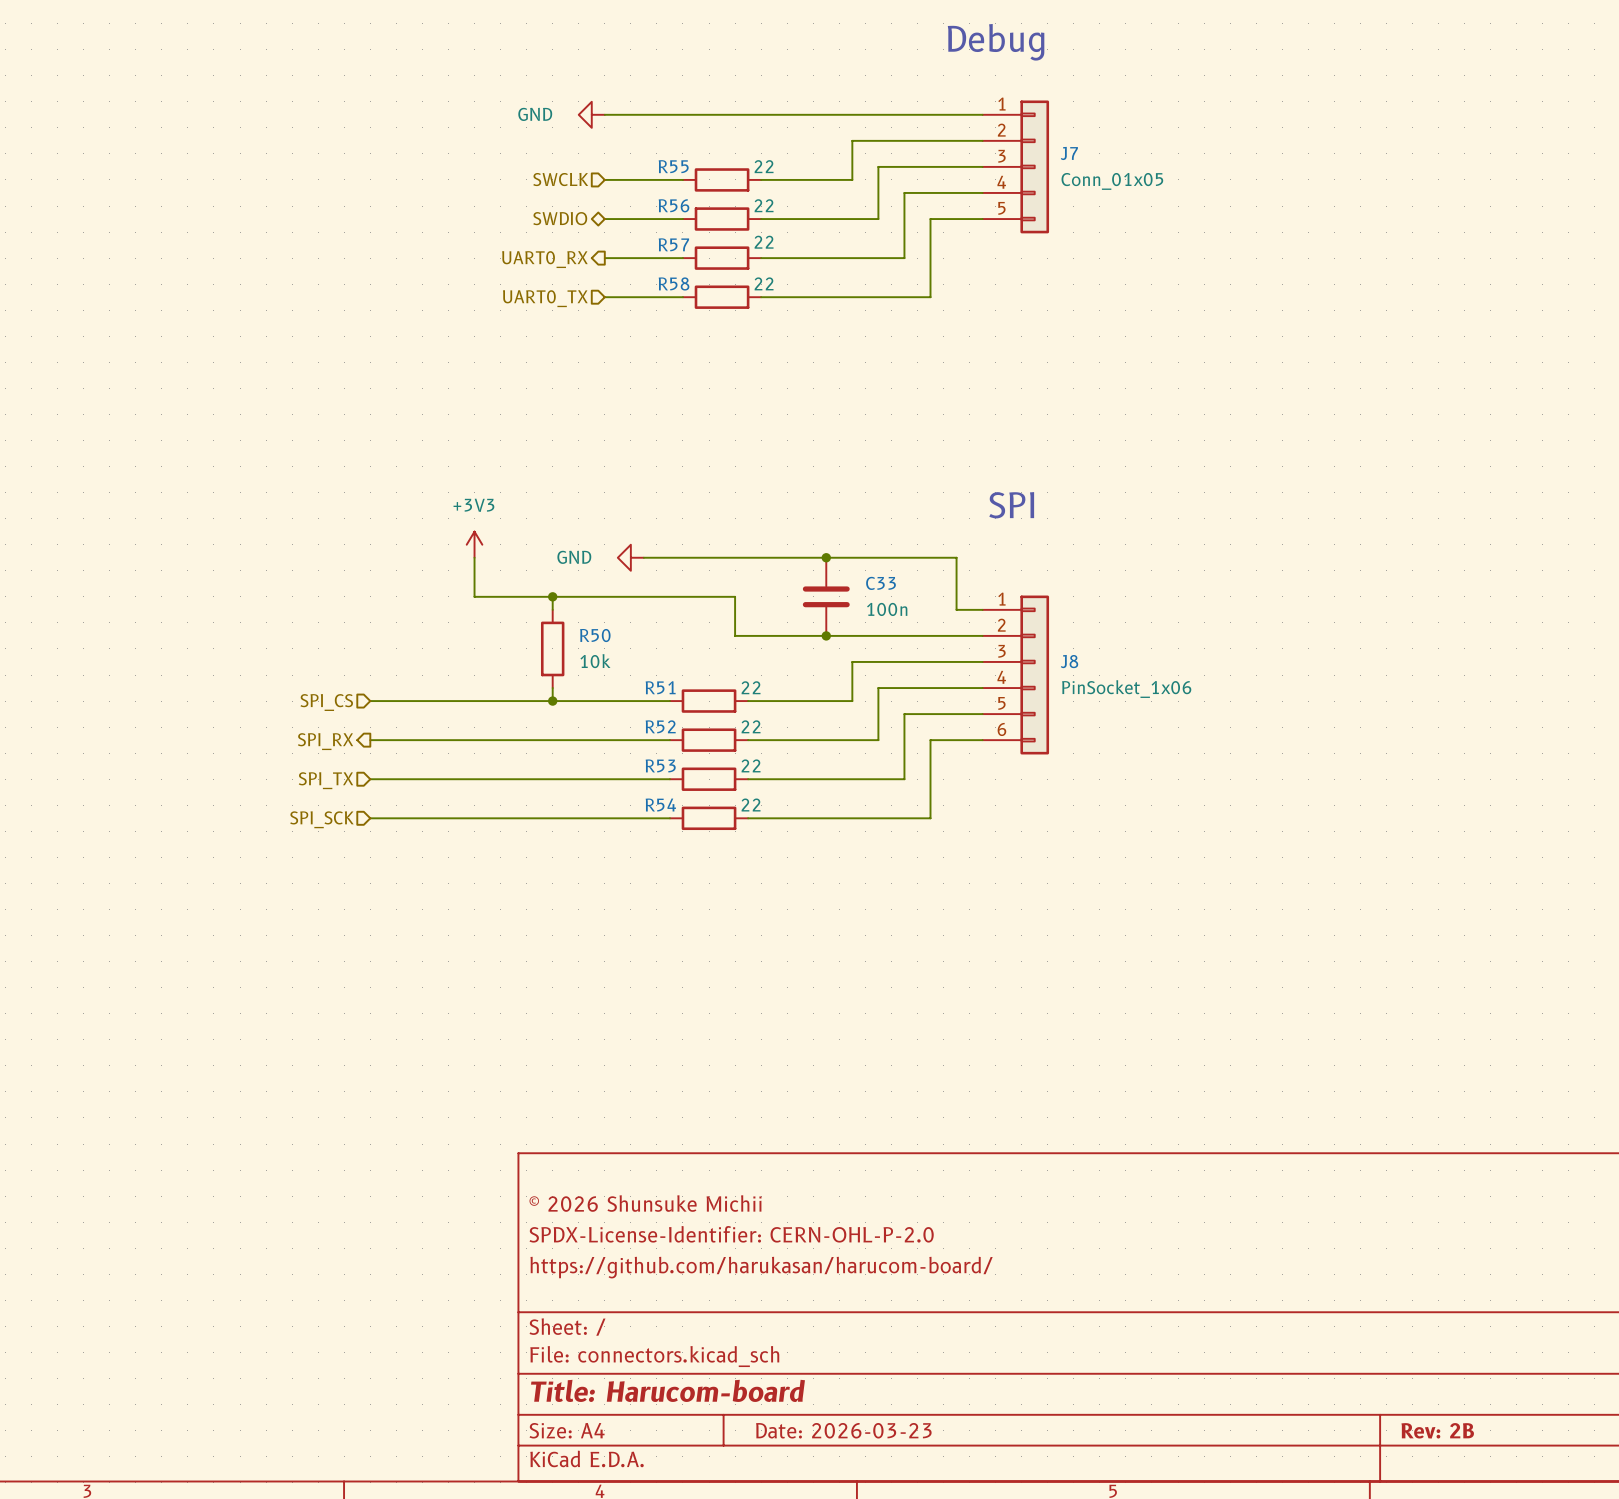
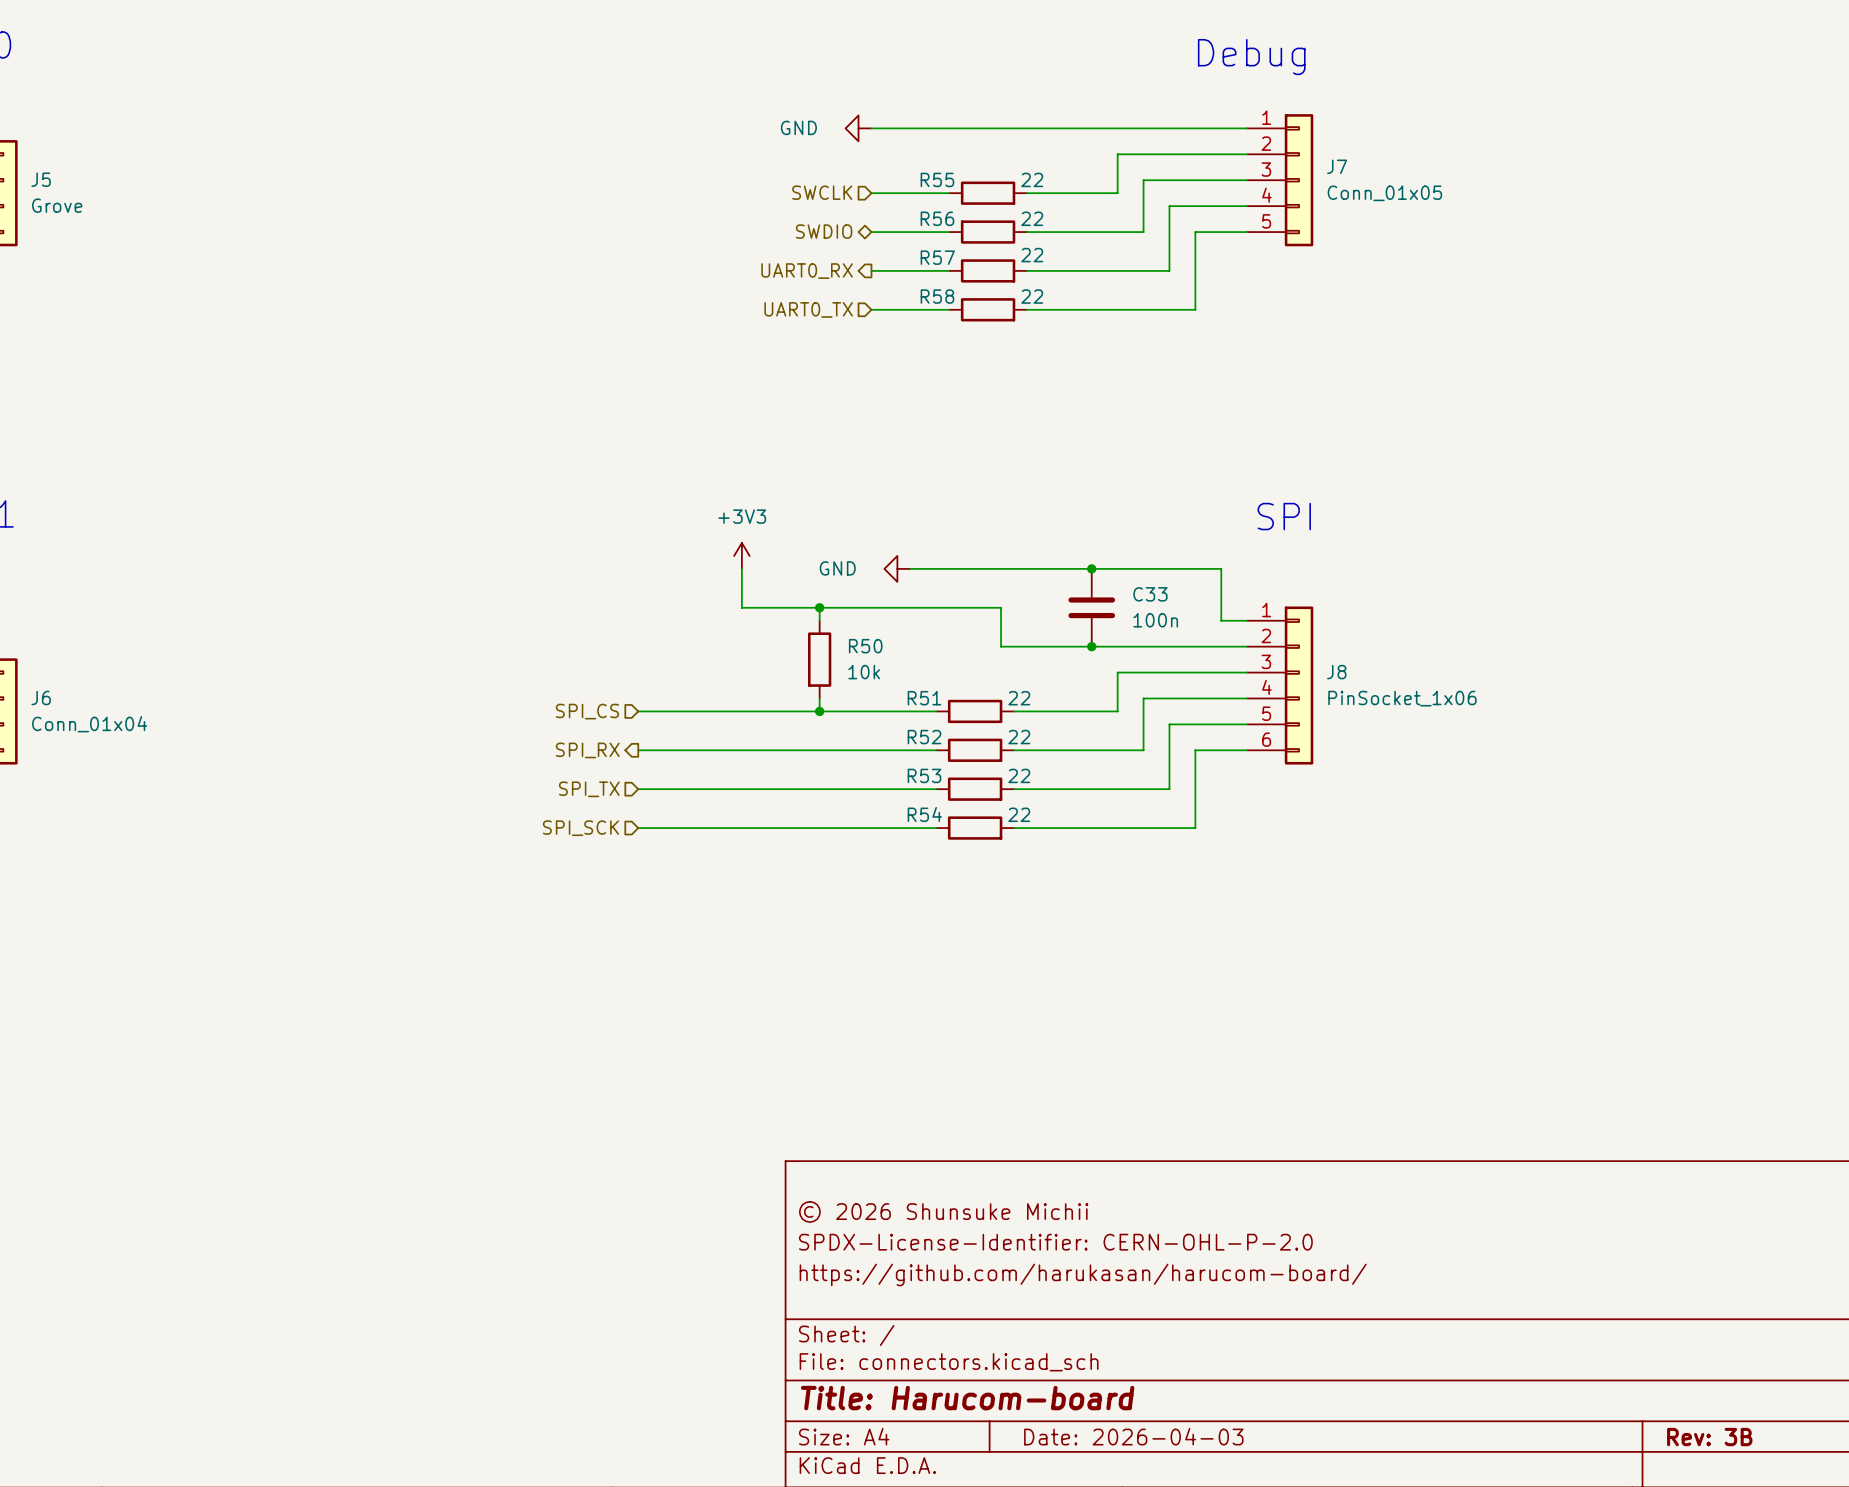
title block: Date: 2026-03-23 (843, 1430) -> Date: 2026-04-03 (1133, 1436)
title block: Rev: 2B (1437, 1430) -> Rev: 3B (1709, 1437)

